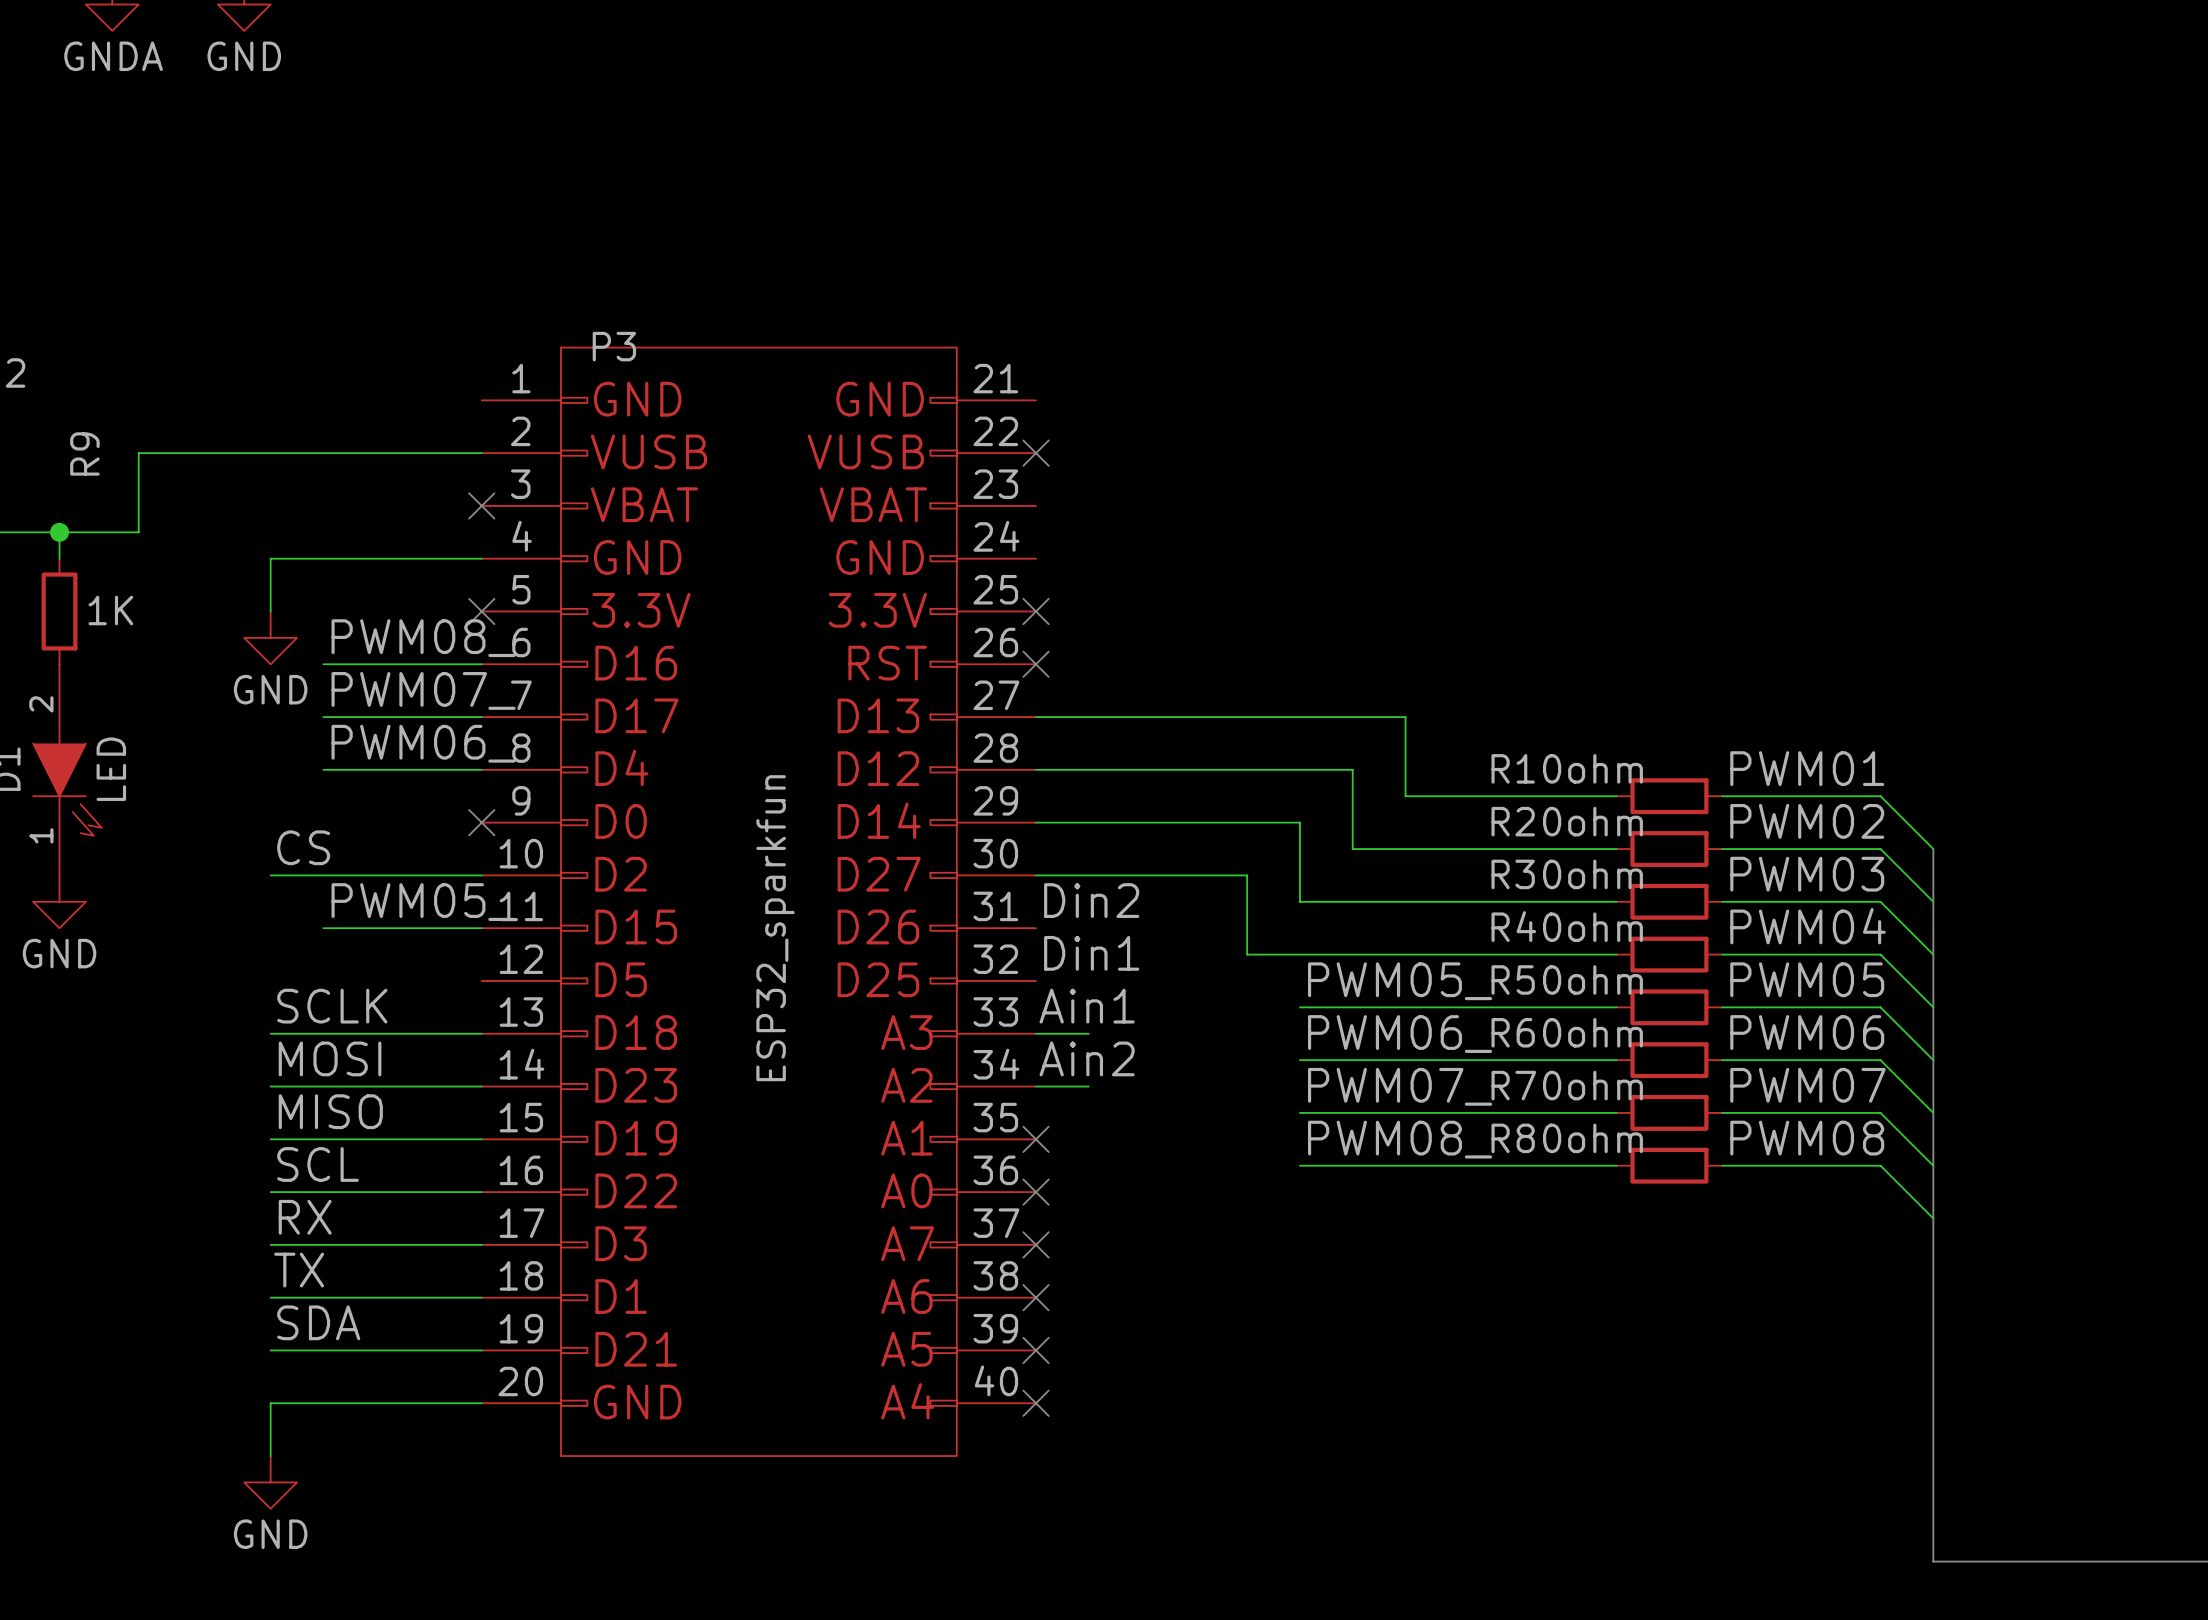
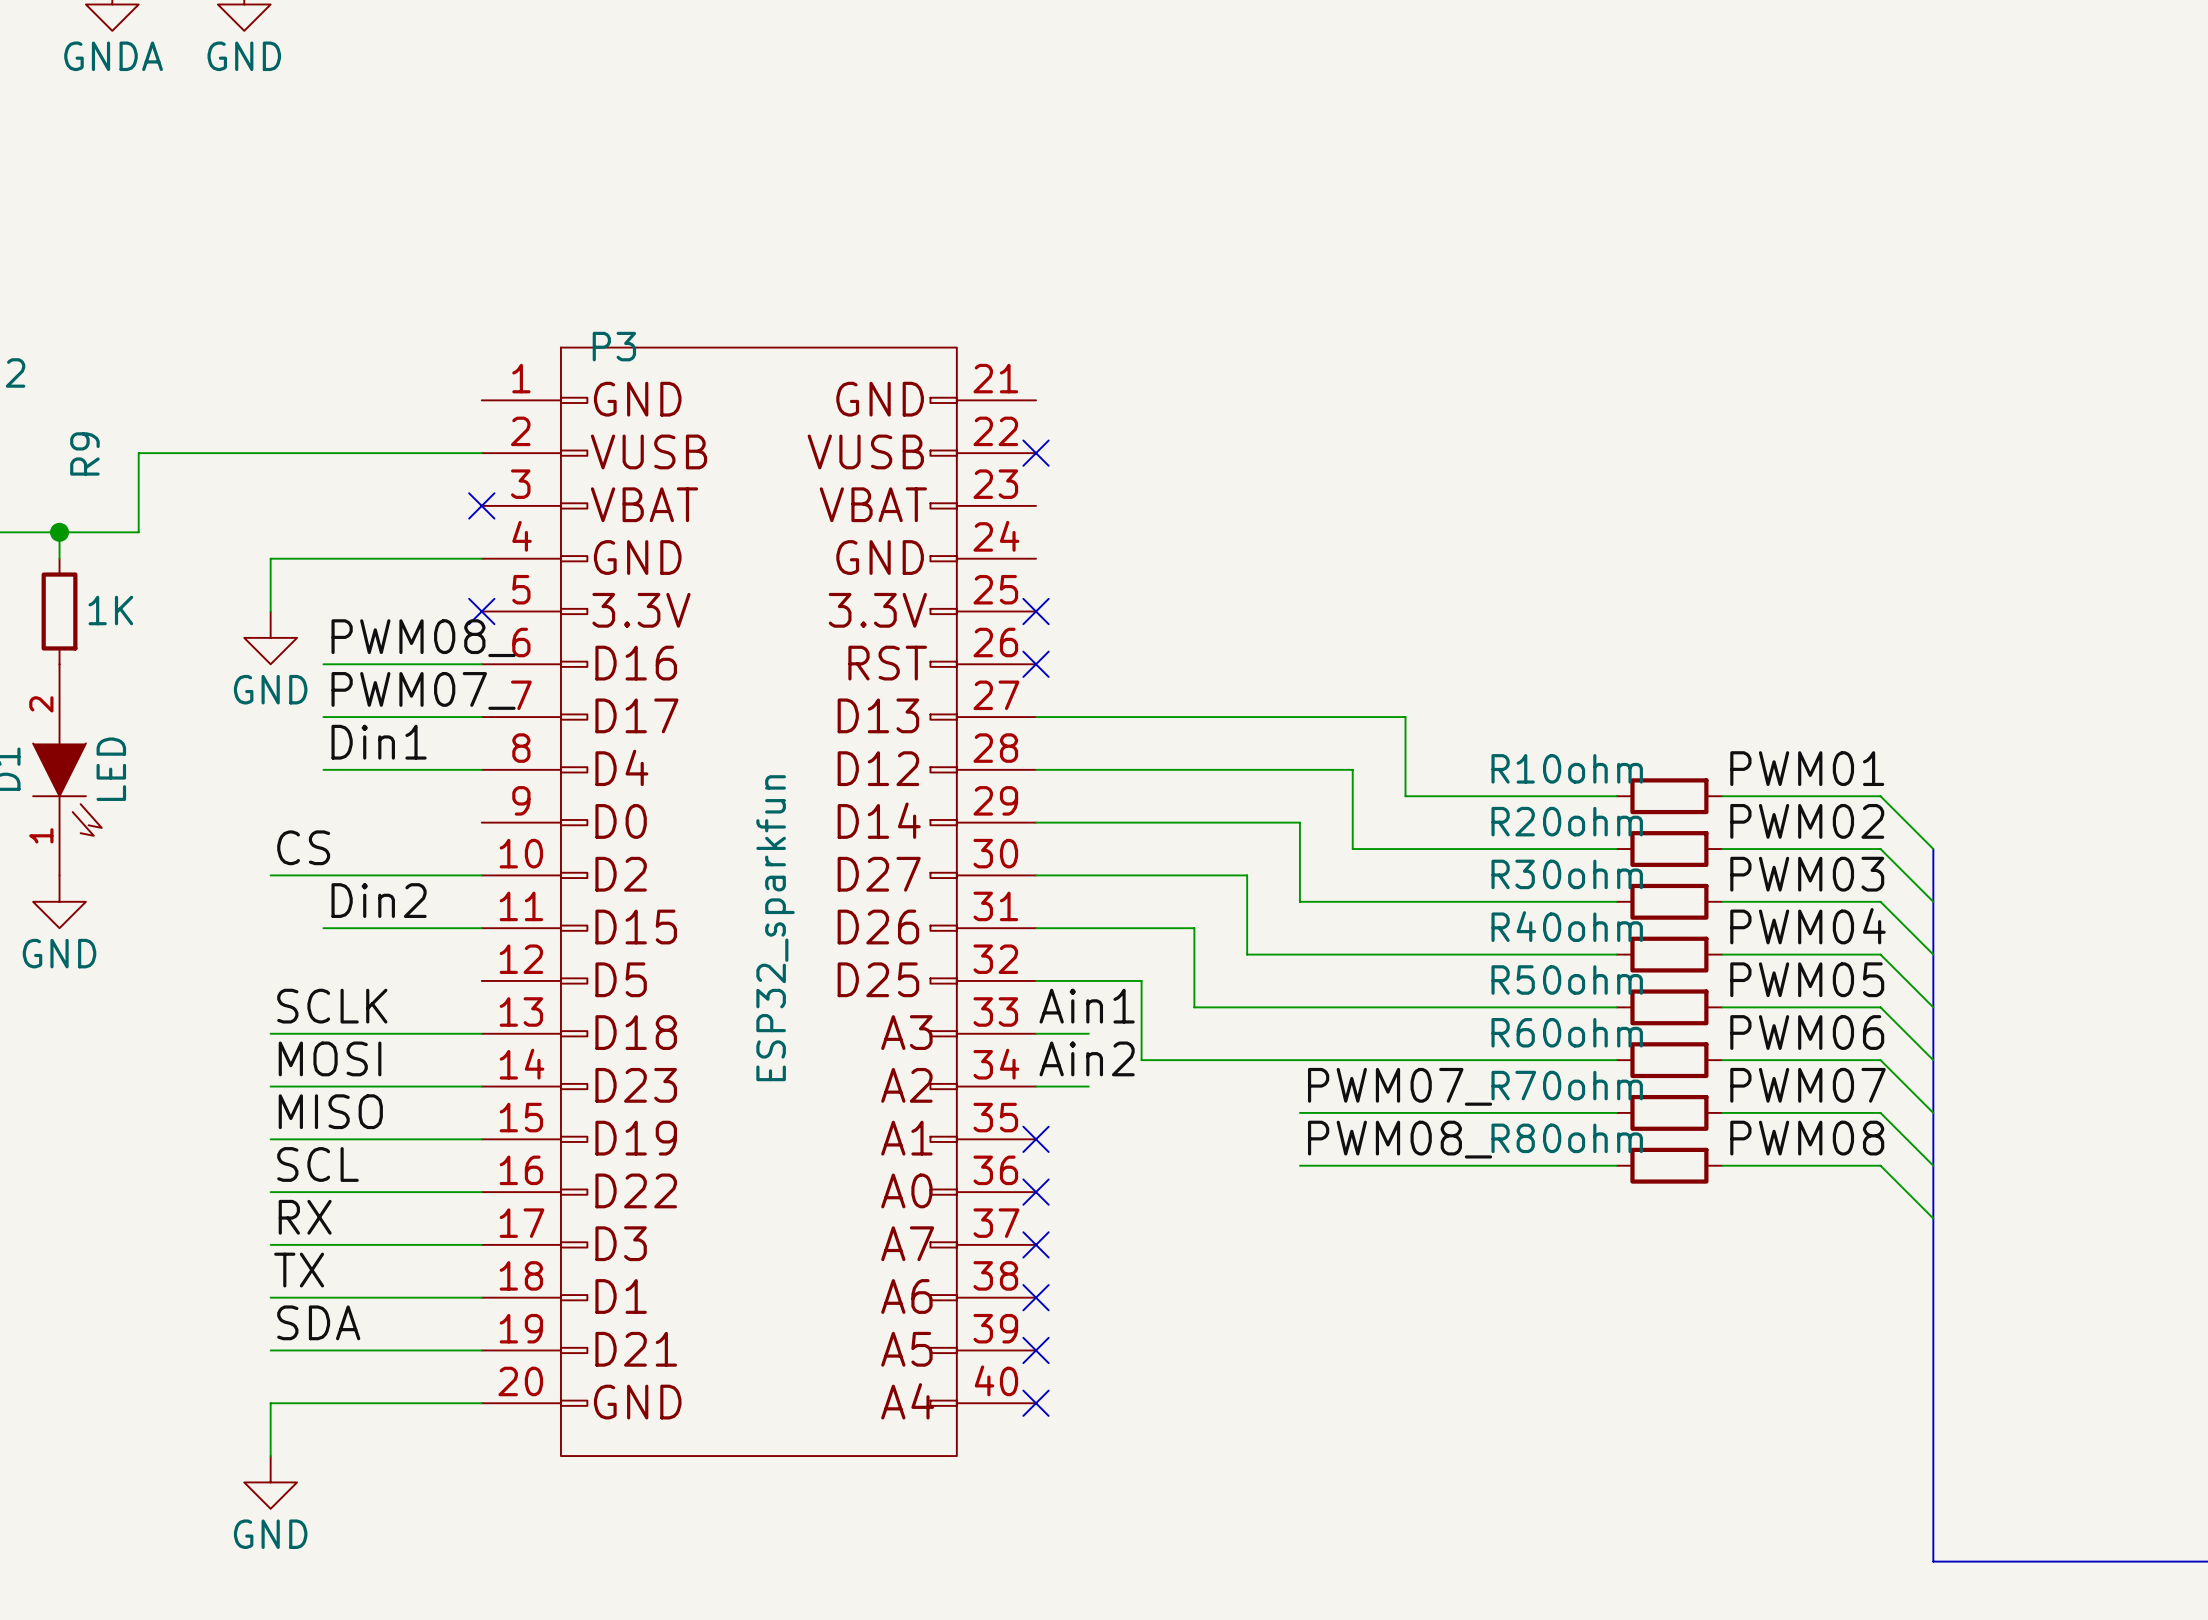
label: PWM06_ (423, 743) -> Din1 (379, 742)
no-connect mark: (481, 822) -> none
label: Din2 (1091, 900) -> none
label: PWM05_ (423, 902) -> Din2 (379, 900)
wire: none -> (1036, 928) (1194, 928) (1194, 1007) (1299, 1007)
label: Din1 (1091, 953) -> none
wire: none -> (1036, 980) (1141, 980) (1141, 1060) (1299, 1060)
label: PWM05_ (1400, 981) -> none
label: PWM06_ (1400, 1034) -> none

